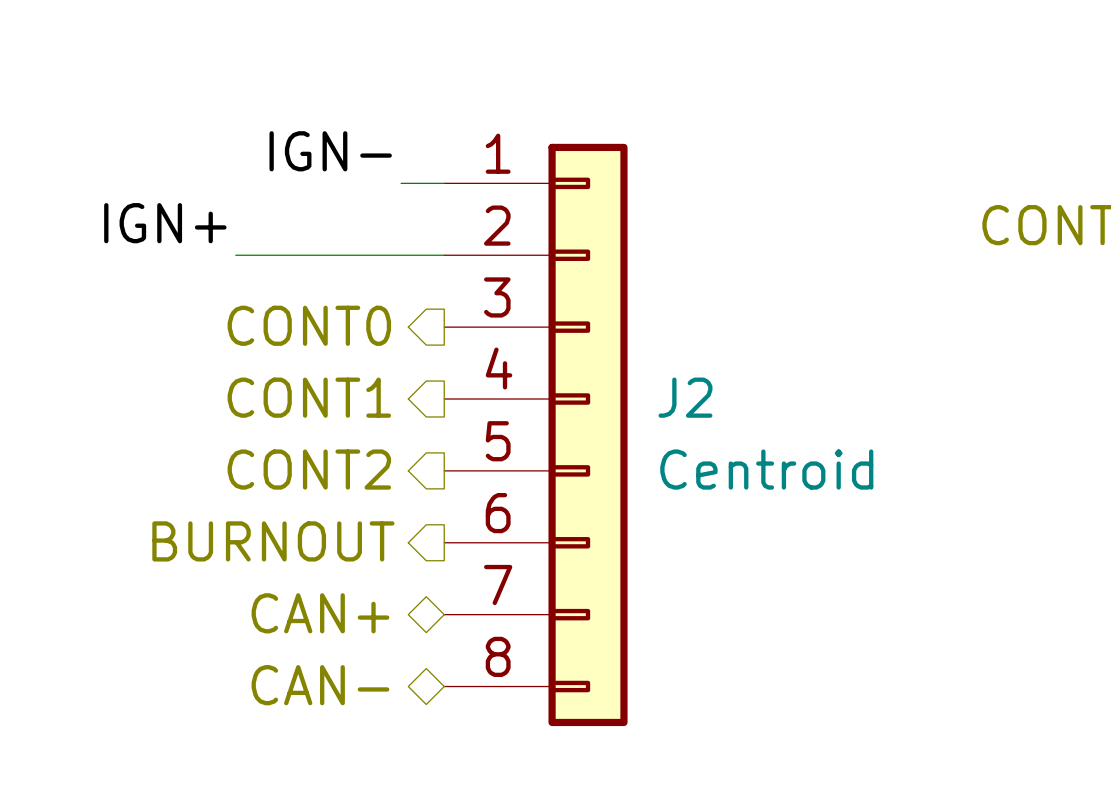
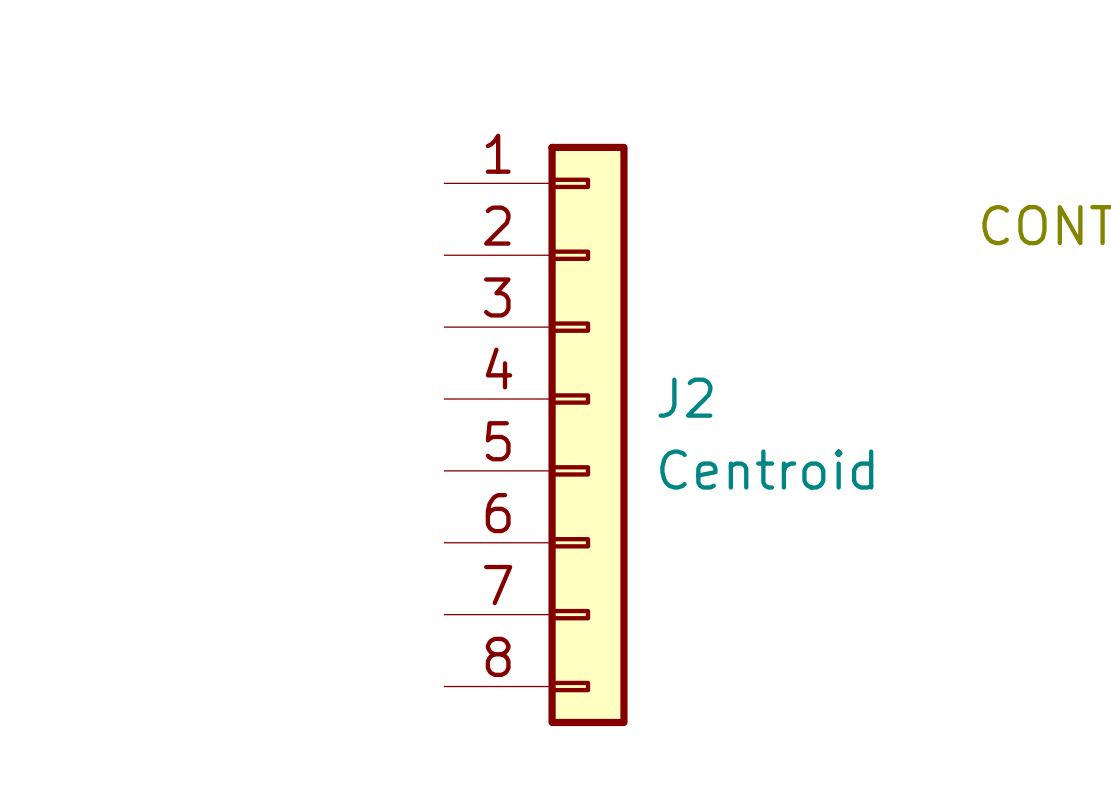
label: IGN- (330, 151) -> none
wire: (401, 183) (444, 183) -> none
label: IGN+ (165, 223) -> none
wire: (235, 255) (444, 255) -> none
hierarchical label: CONT0 (309, 325) -> none
hierarchical label: CONT1 (309, 397) -> none
hierarchical label: CONT2 (309, 469) -> none
hierarchical label: BURNOUT (273, 541) -> none
hierarchical label: CAN+ (320, 613) -> none
hierarchical label: CAN- (320, 685) -> none

